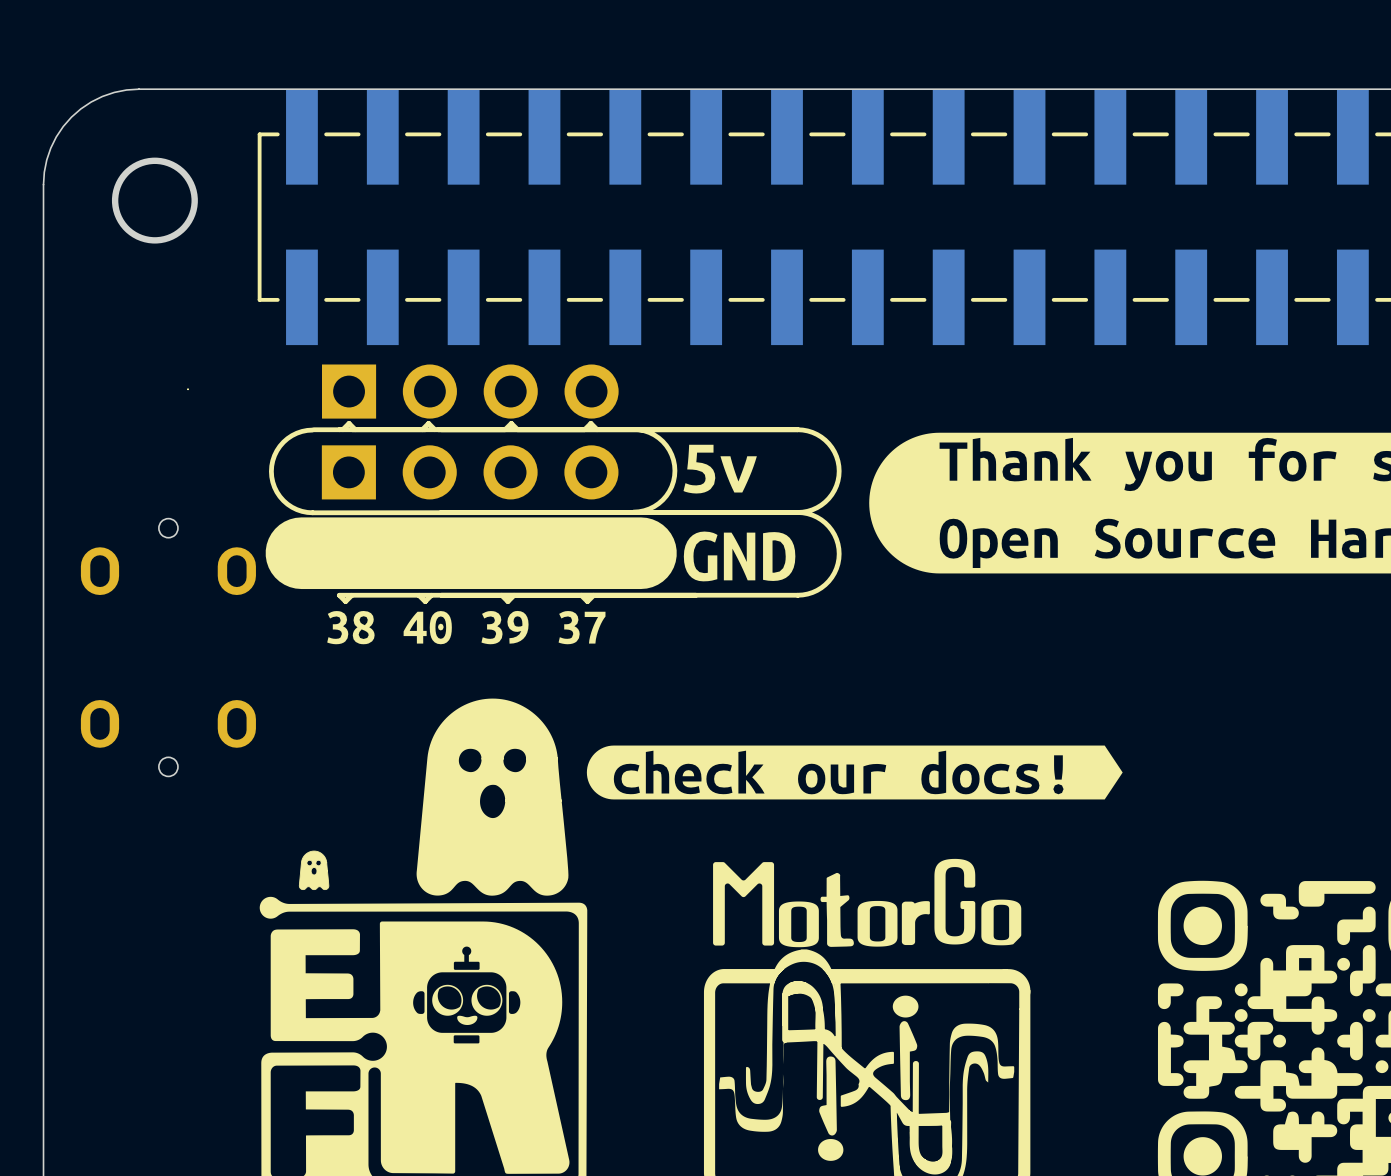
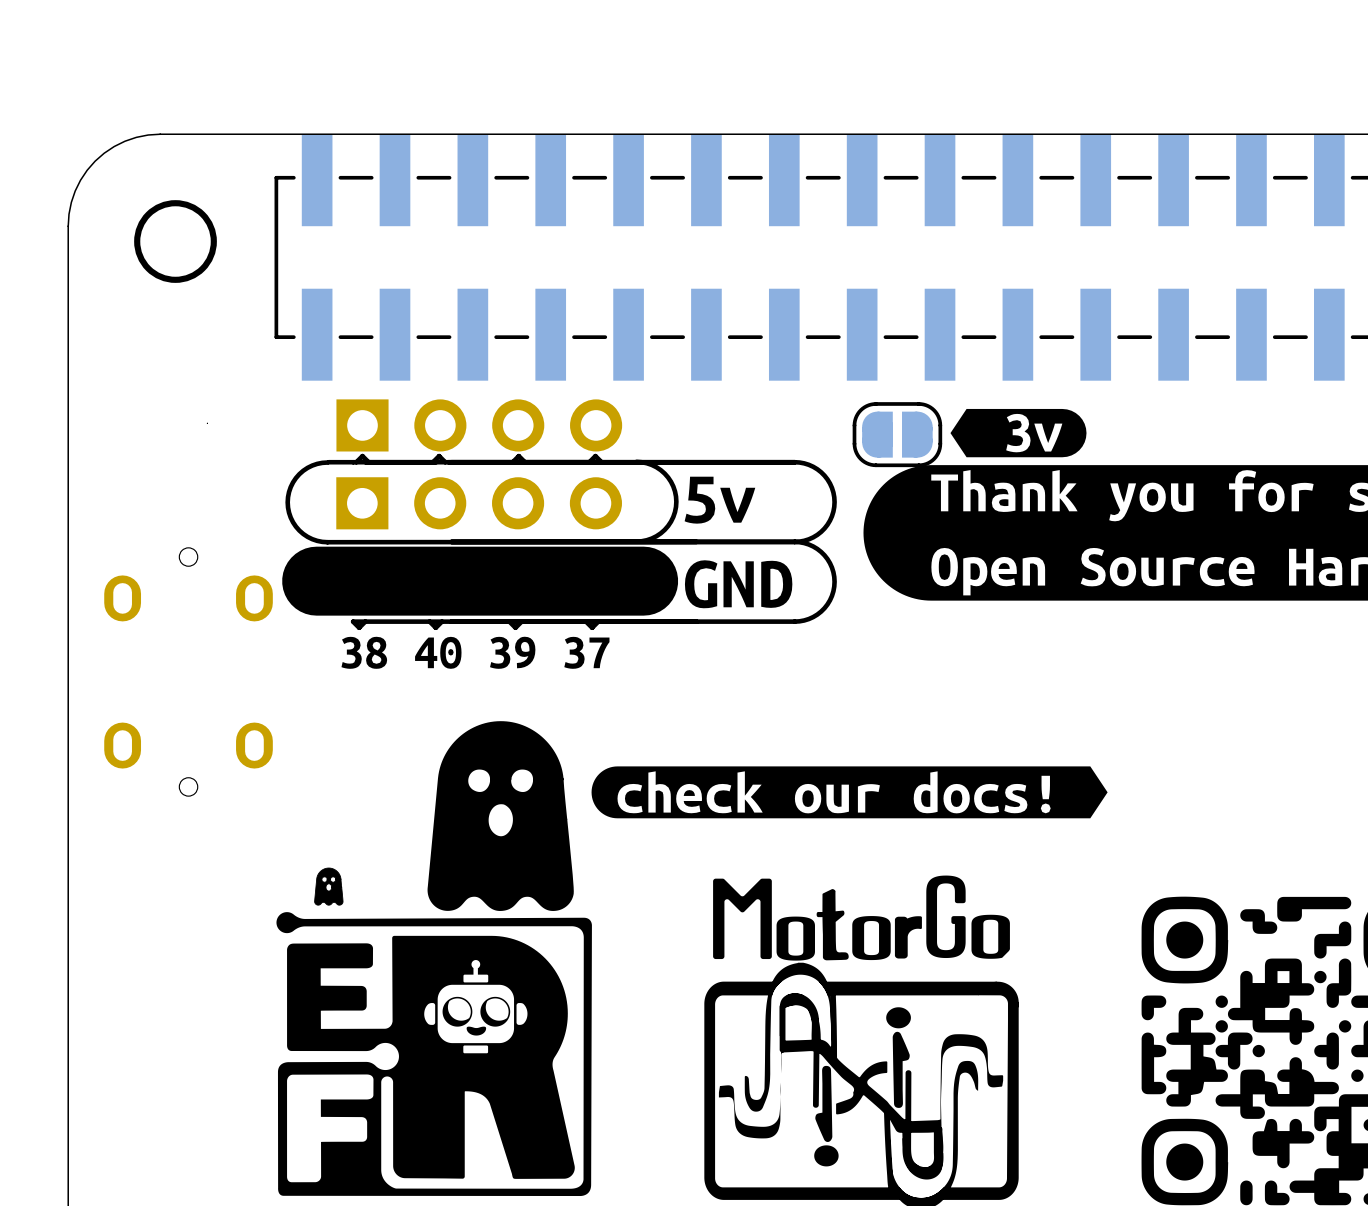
drawing: none -> [950, 408, 1087, 458]
part: none -> (897, 434)

